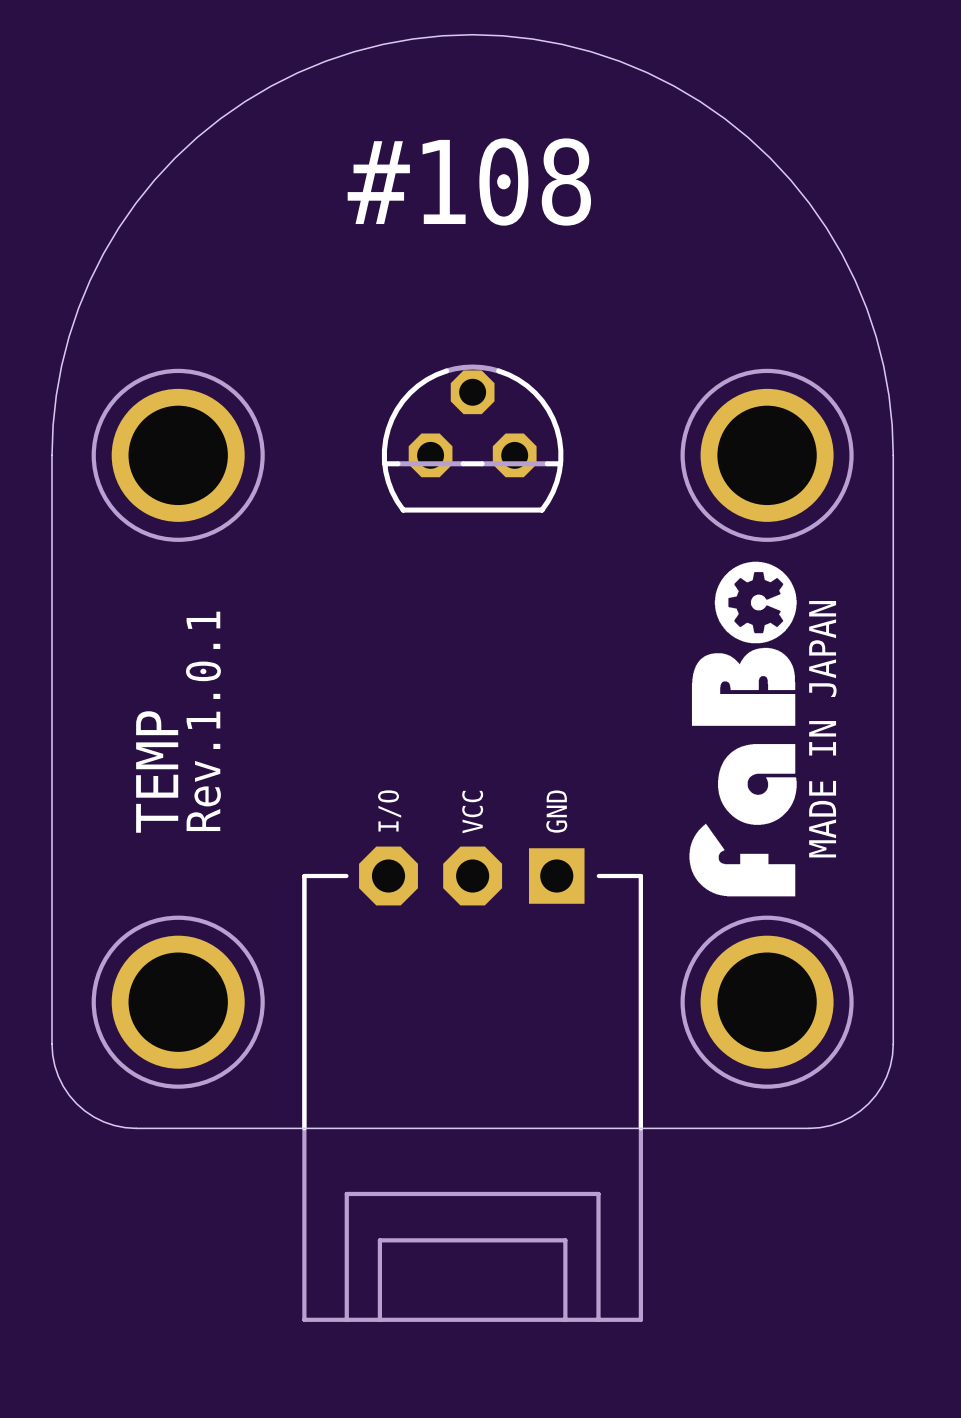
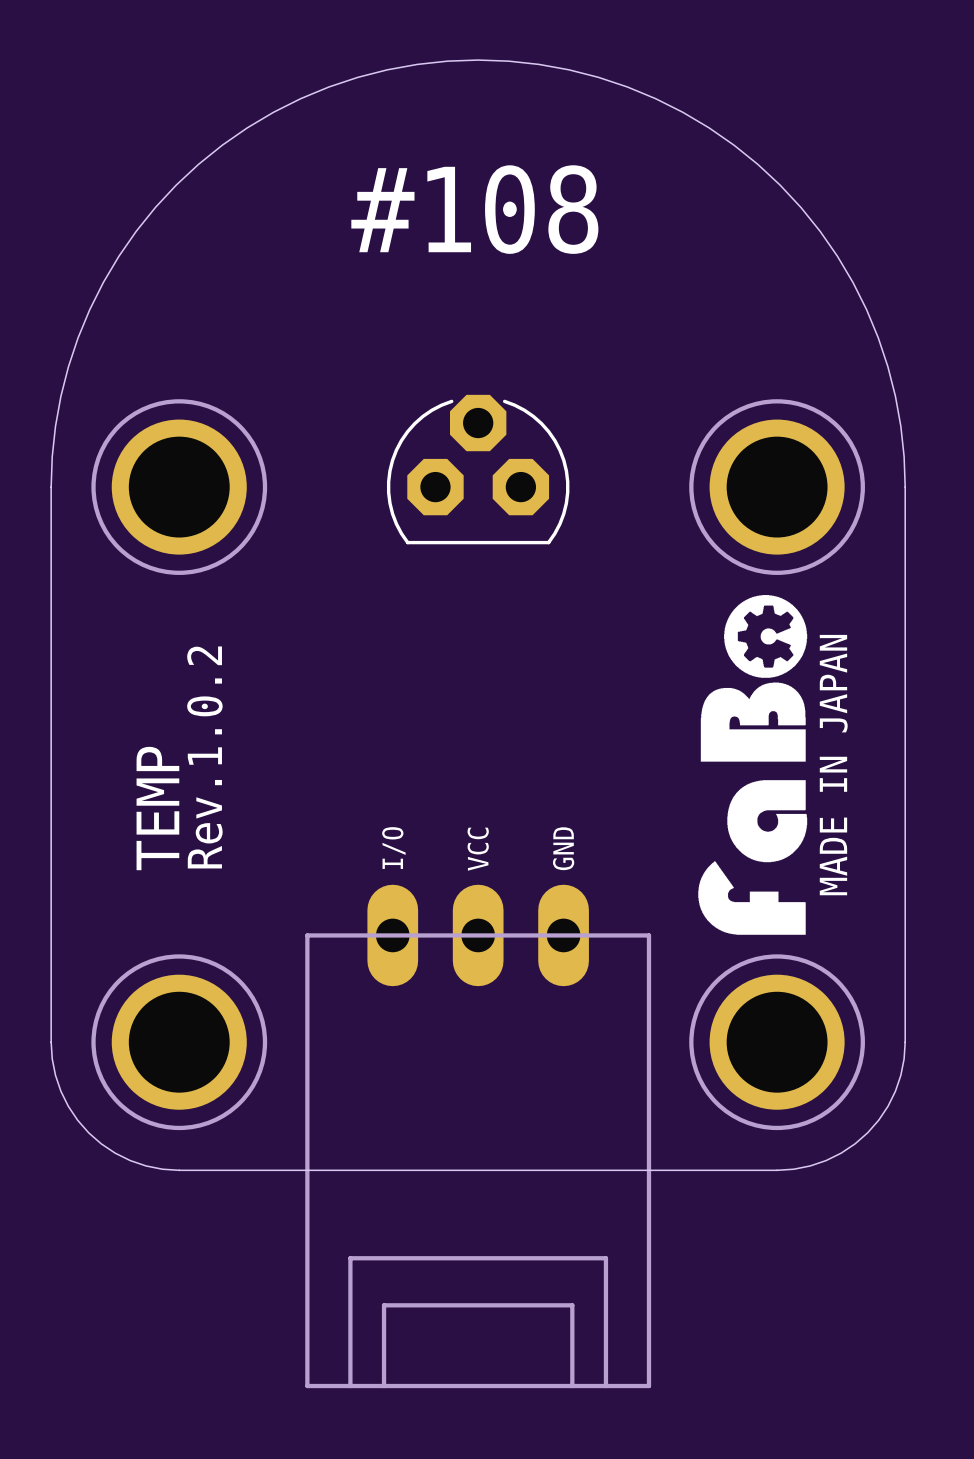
part footprint: [52, 34, 894, 1322] -> [51, 60, 906, 1389]
part footprint: [381, 364, 564, 513] -> [386, 394, 570, 545]
text: Rev.1.0.1 (203, 721) -> Rev.1.0.2 (204, 757)

